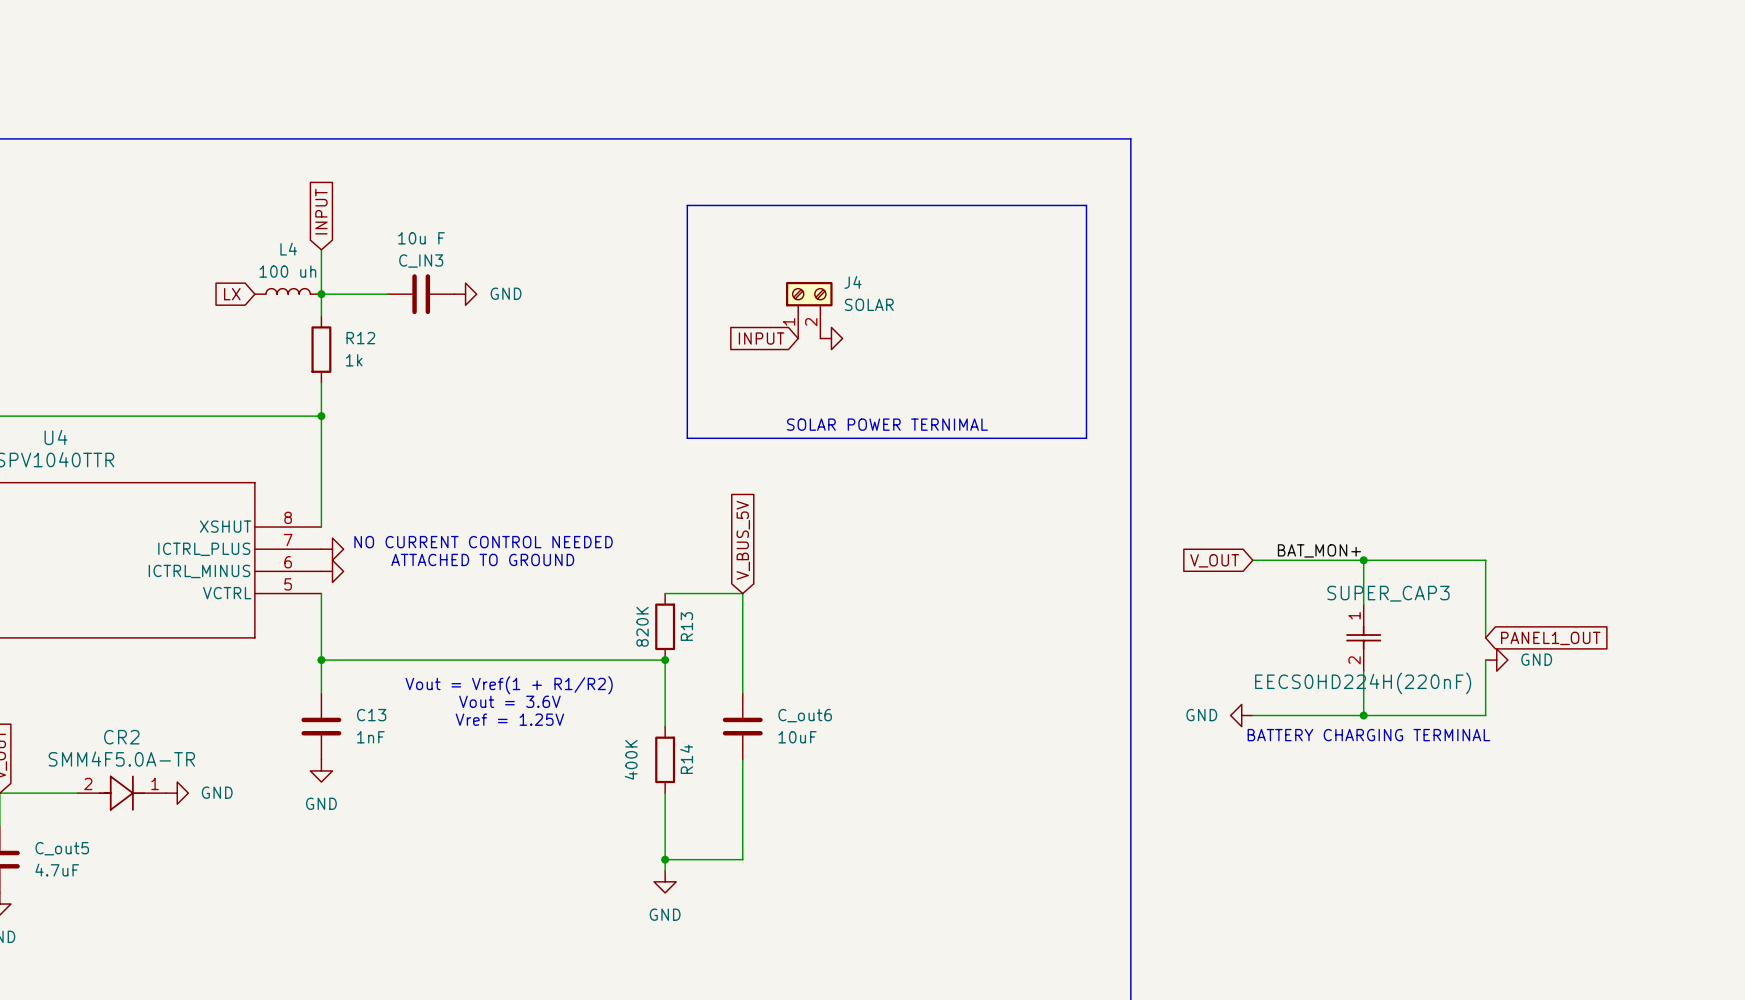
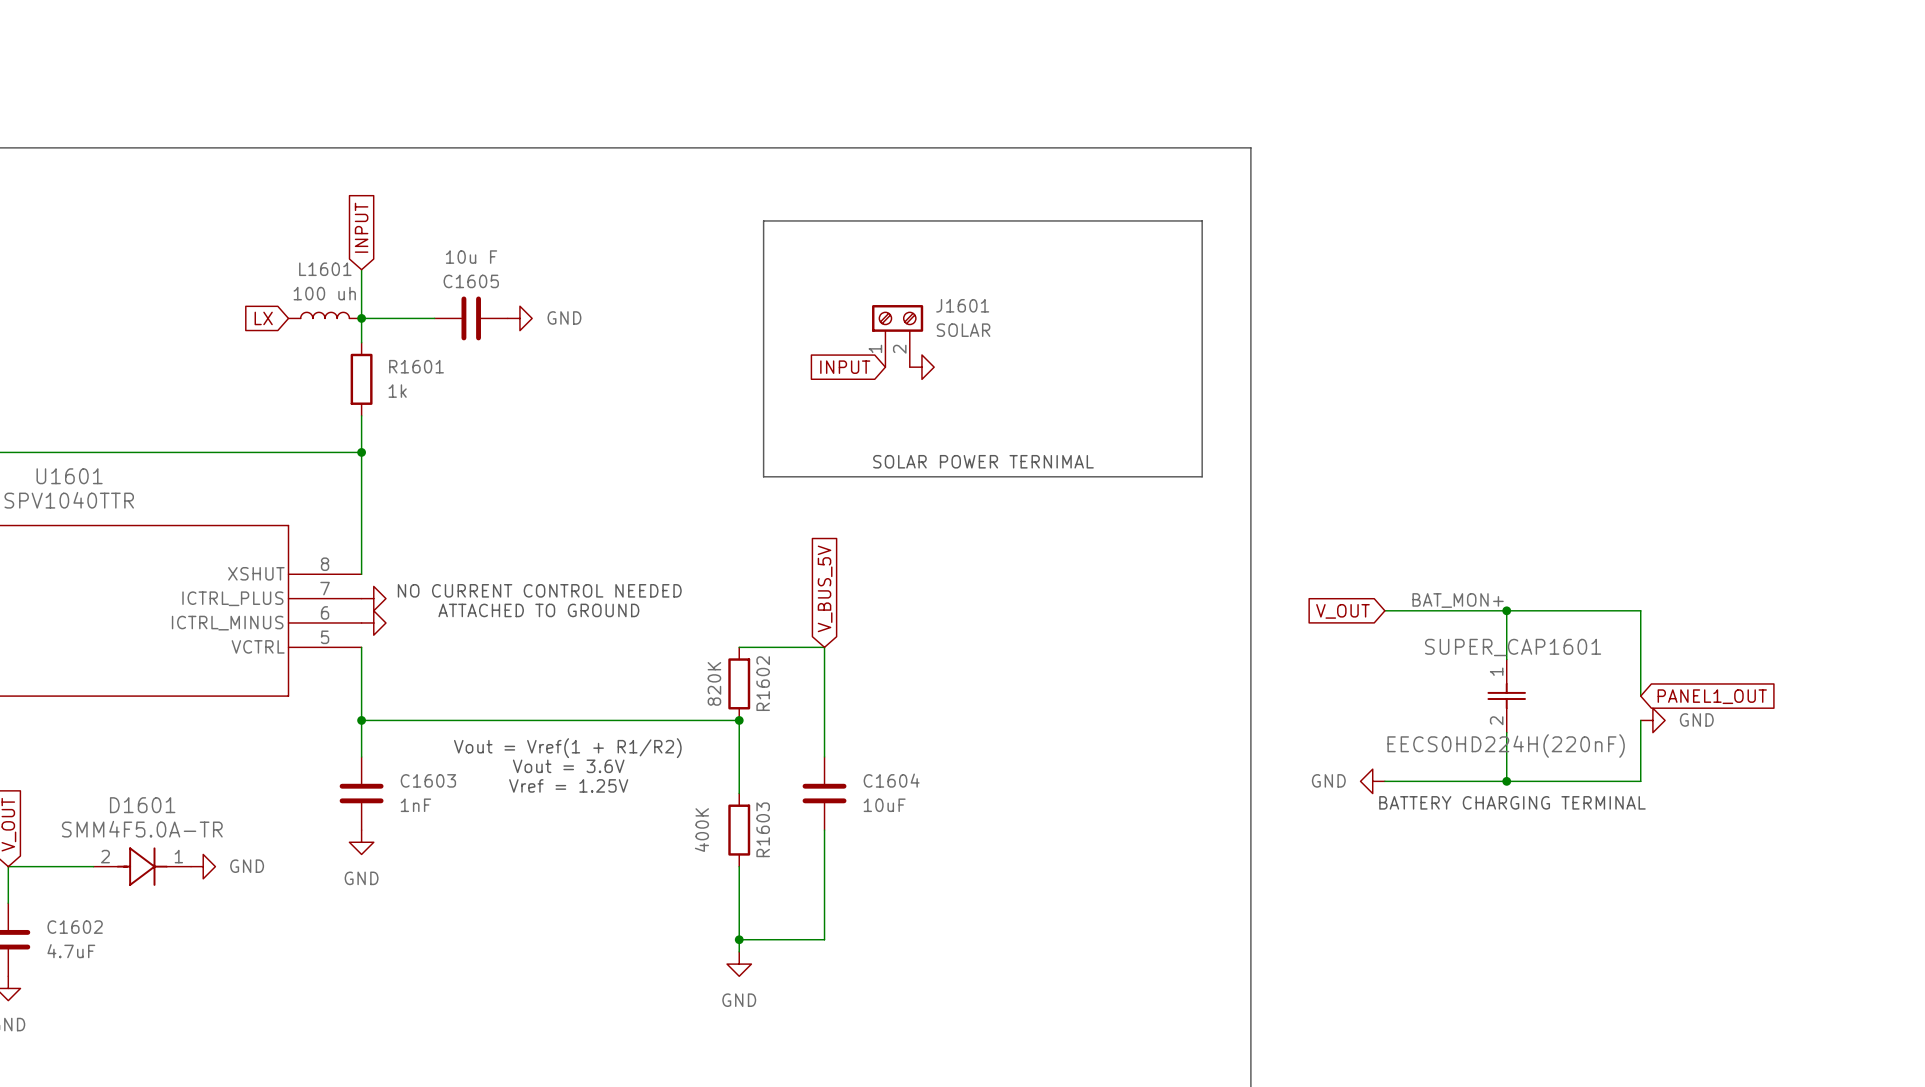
L4 name: L4 (288, 249) -> L1601 (325, 269)
C_IN3 name: C_IN3 (421, 261) -> C1605 (471, 281)
J4 name: J4 (852, 282) -> J1601 (962, 305)
R12 name: R12 (360, 338) -> R1601 (416, 366)
U4 name: U4 (55, 437) -> U1601 (69, 476)
SUPER_CAP3 name: SUPER_CAP3 (1388, 593) -> SUPER_CAP1601 (1513, 647)
R13 name: R13 (686, 626) -> R1602 (763, 683)
C13 name: C13 (371, 715) -> C1603 (428, 780)
C_out6 name: C_out6 (805, 715) -> C1604 (891, 780)
CR2 name: CR2 (121, 737) -> D1601 (142, 805)
R14 name: R14 (686, 759) -> R1603 (763, 829)
C_out5 name: C_out5 (62, 848) -> C1602 (75, 927)

